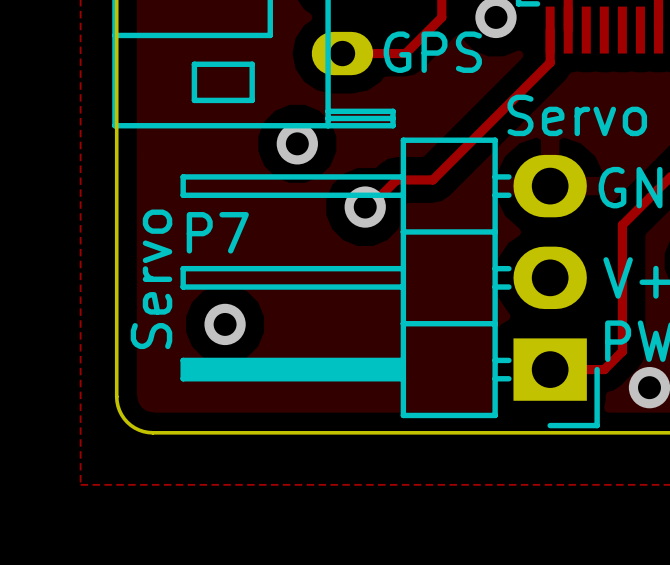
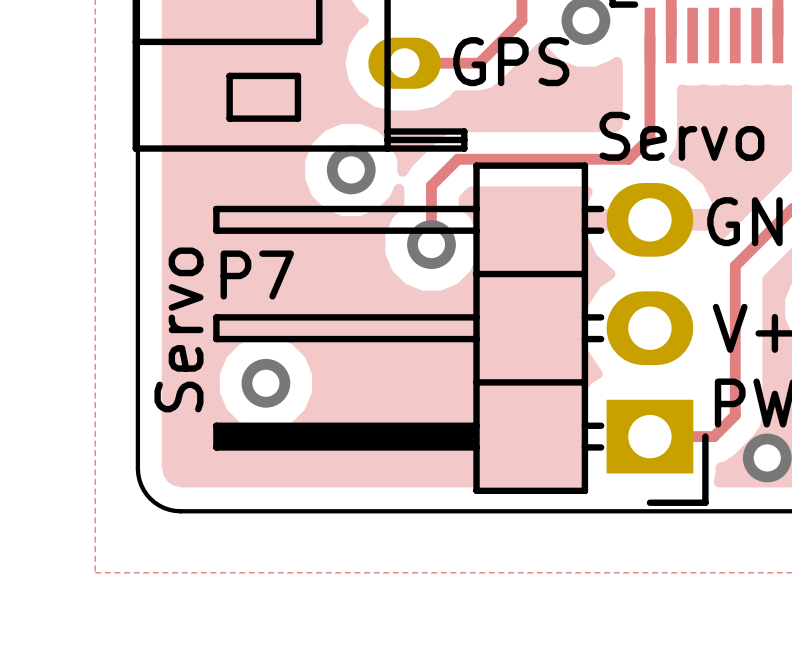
track: (550, 62) (432, 179) (396, 179) (369, 207) -> (649, 74) (649, 137) (628, 159) (457, 159) (431, 185) (431, 244)

